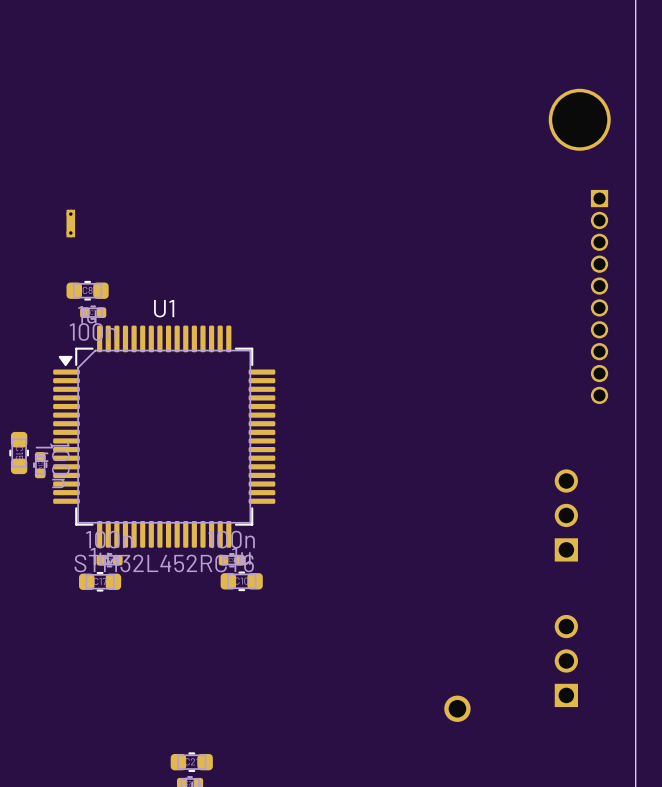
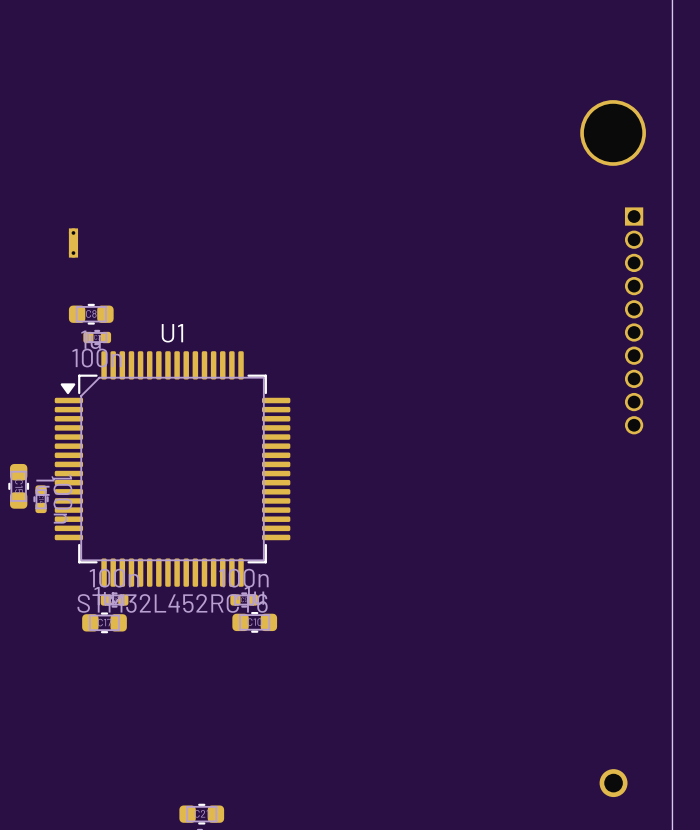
part: (566, 515) -> none
part: (566, 660) -> none
part position: (457, 708) -> (613, 783)

